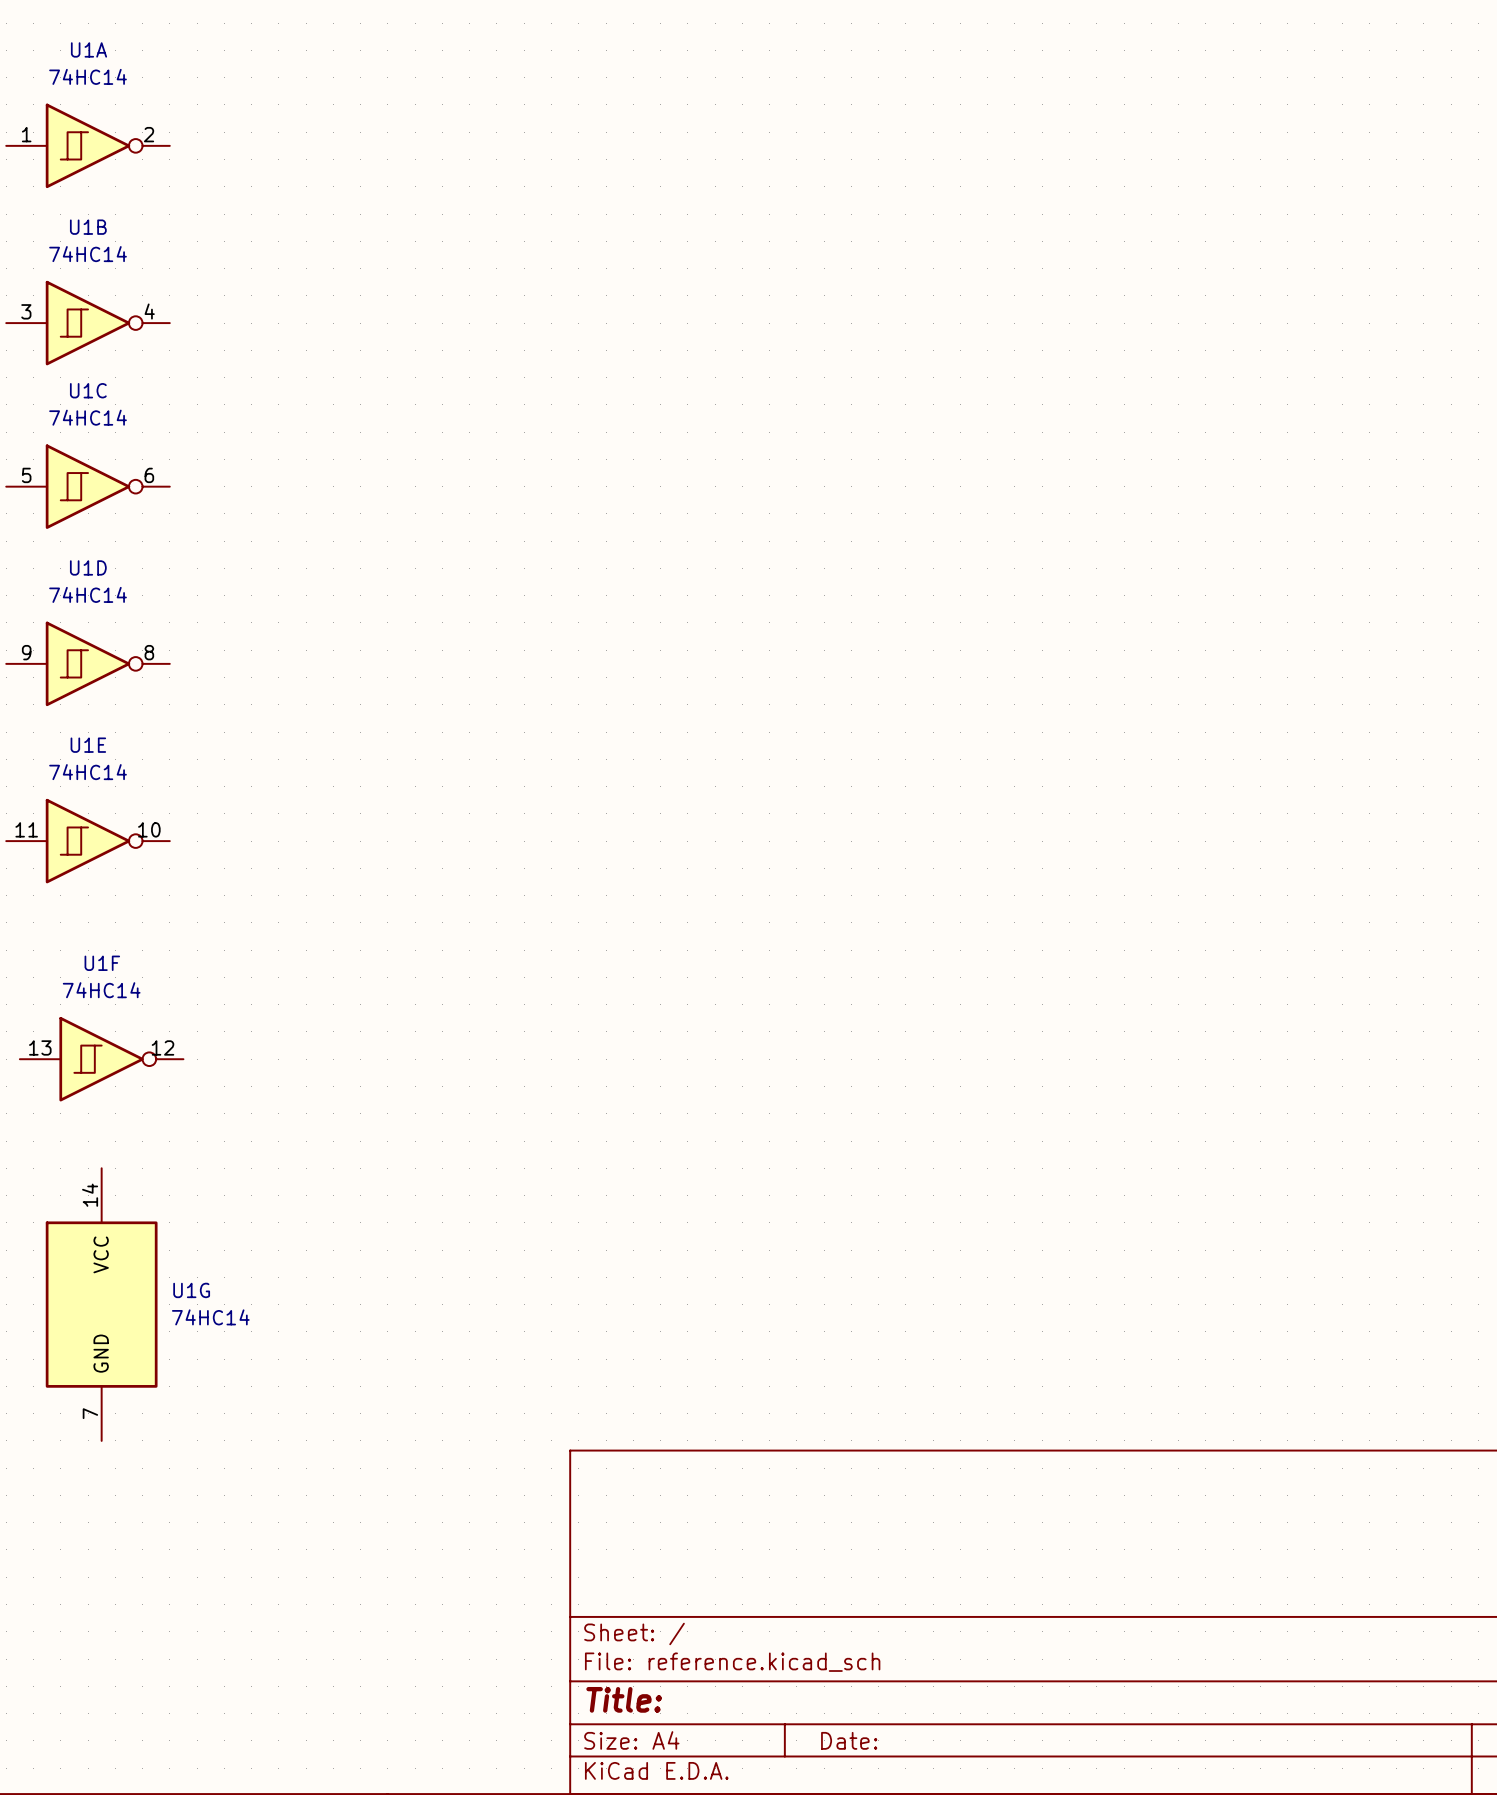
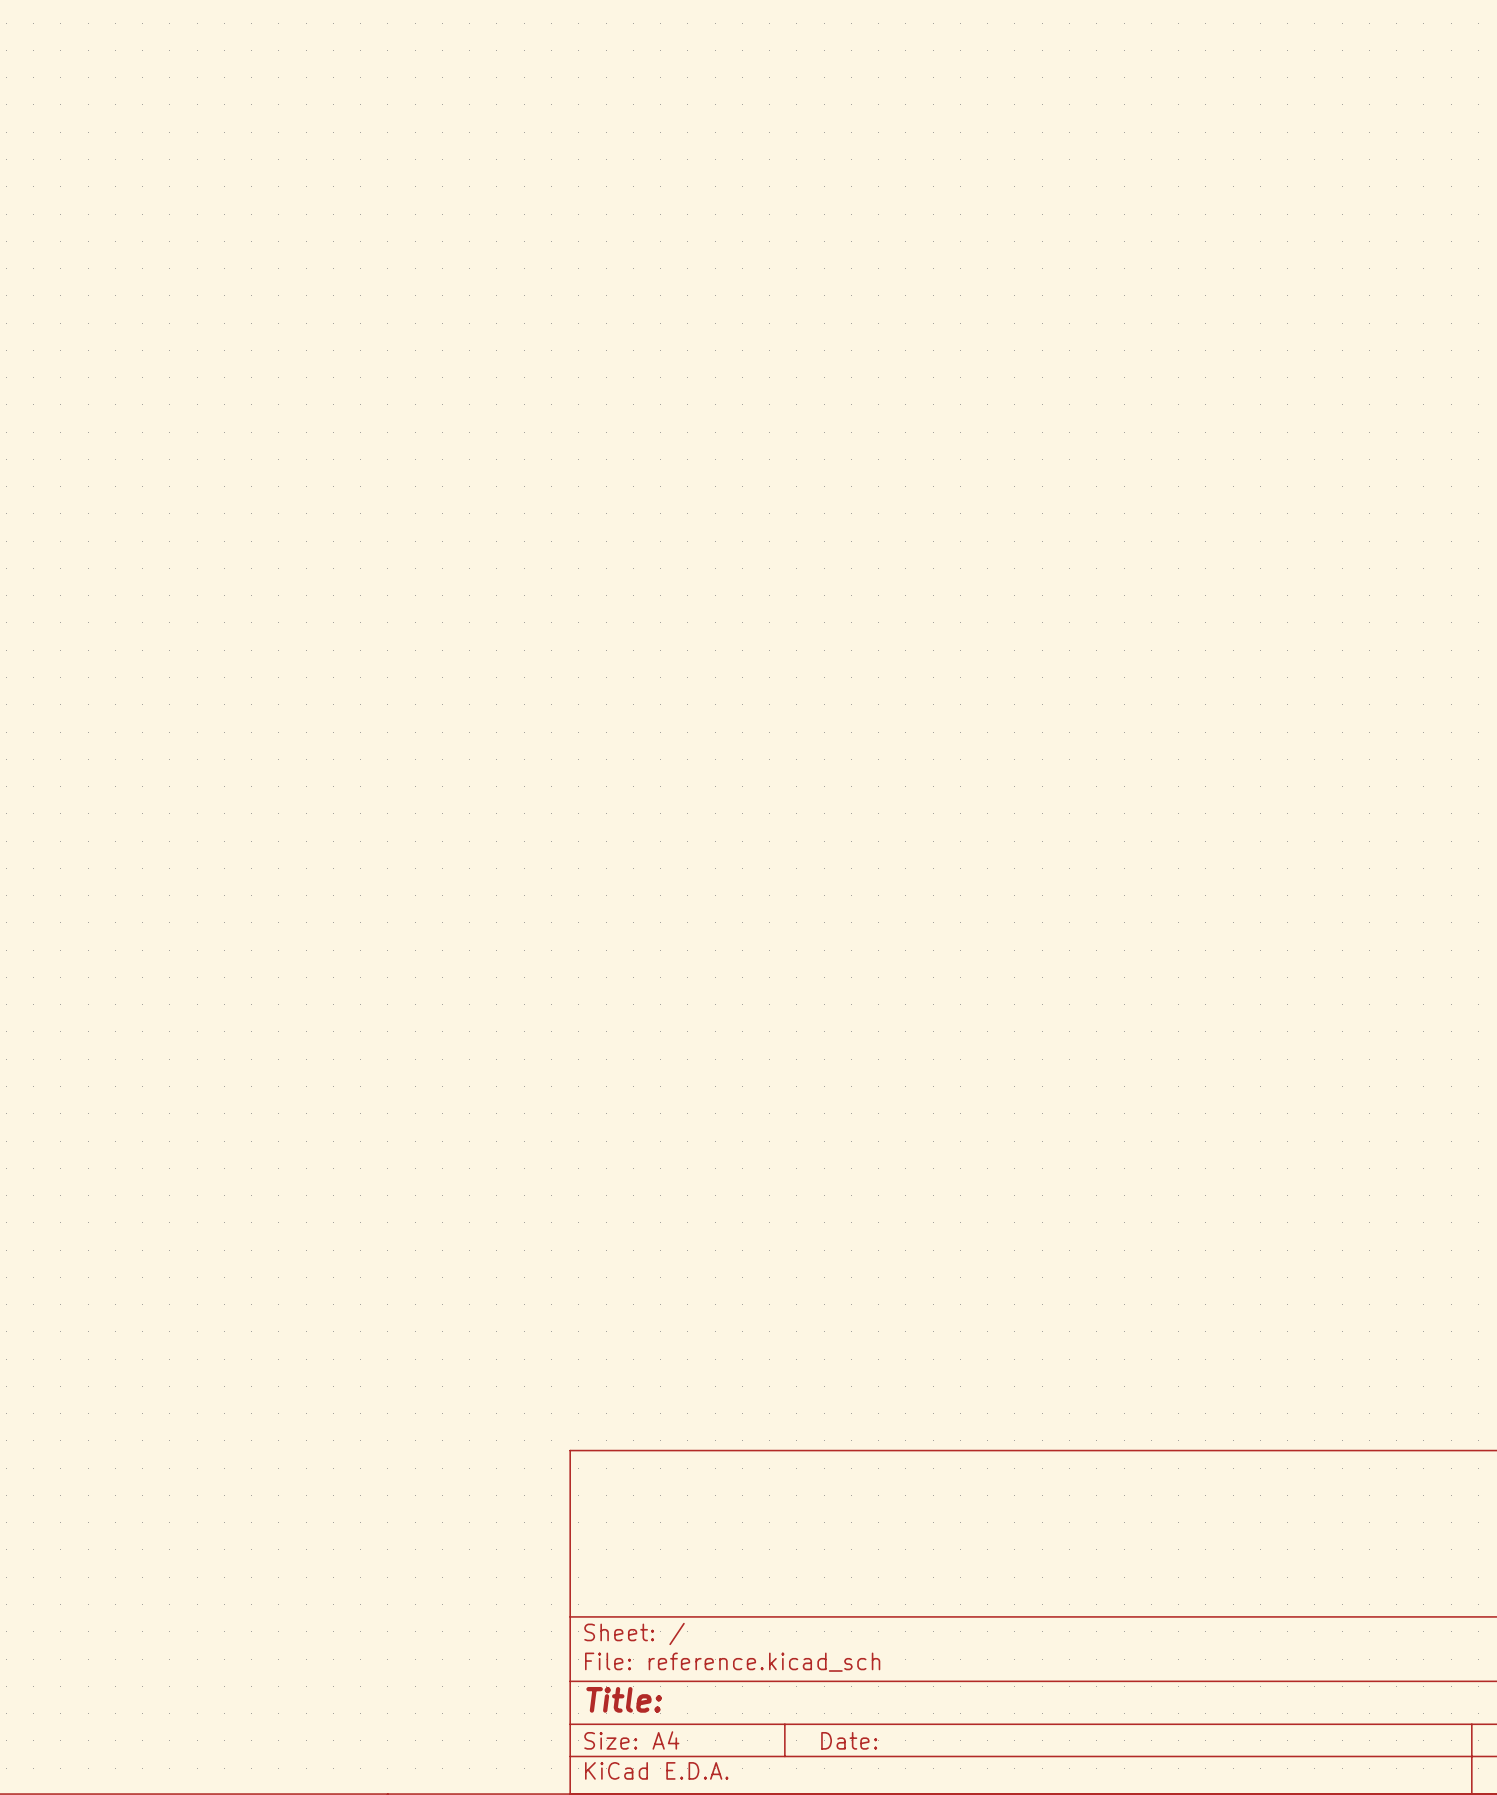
U1A: 74HC14 (88, 145) -> none
U1B: 74HC14 (88, 323) -> none
U1C: 74HC14 (88, 486) -> none
U1D: 74HC14 (88, 663) -> none
U1E: 74HC14 (88, 841) -> none
U1F: 74HC14 (101, 1059) -> none
U1G: 74HC14 (101, 1304) -> none

